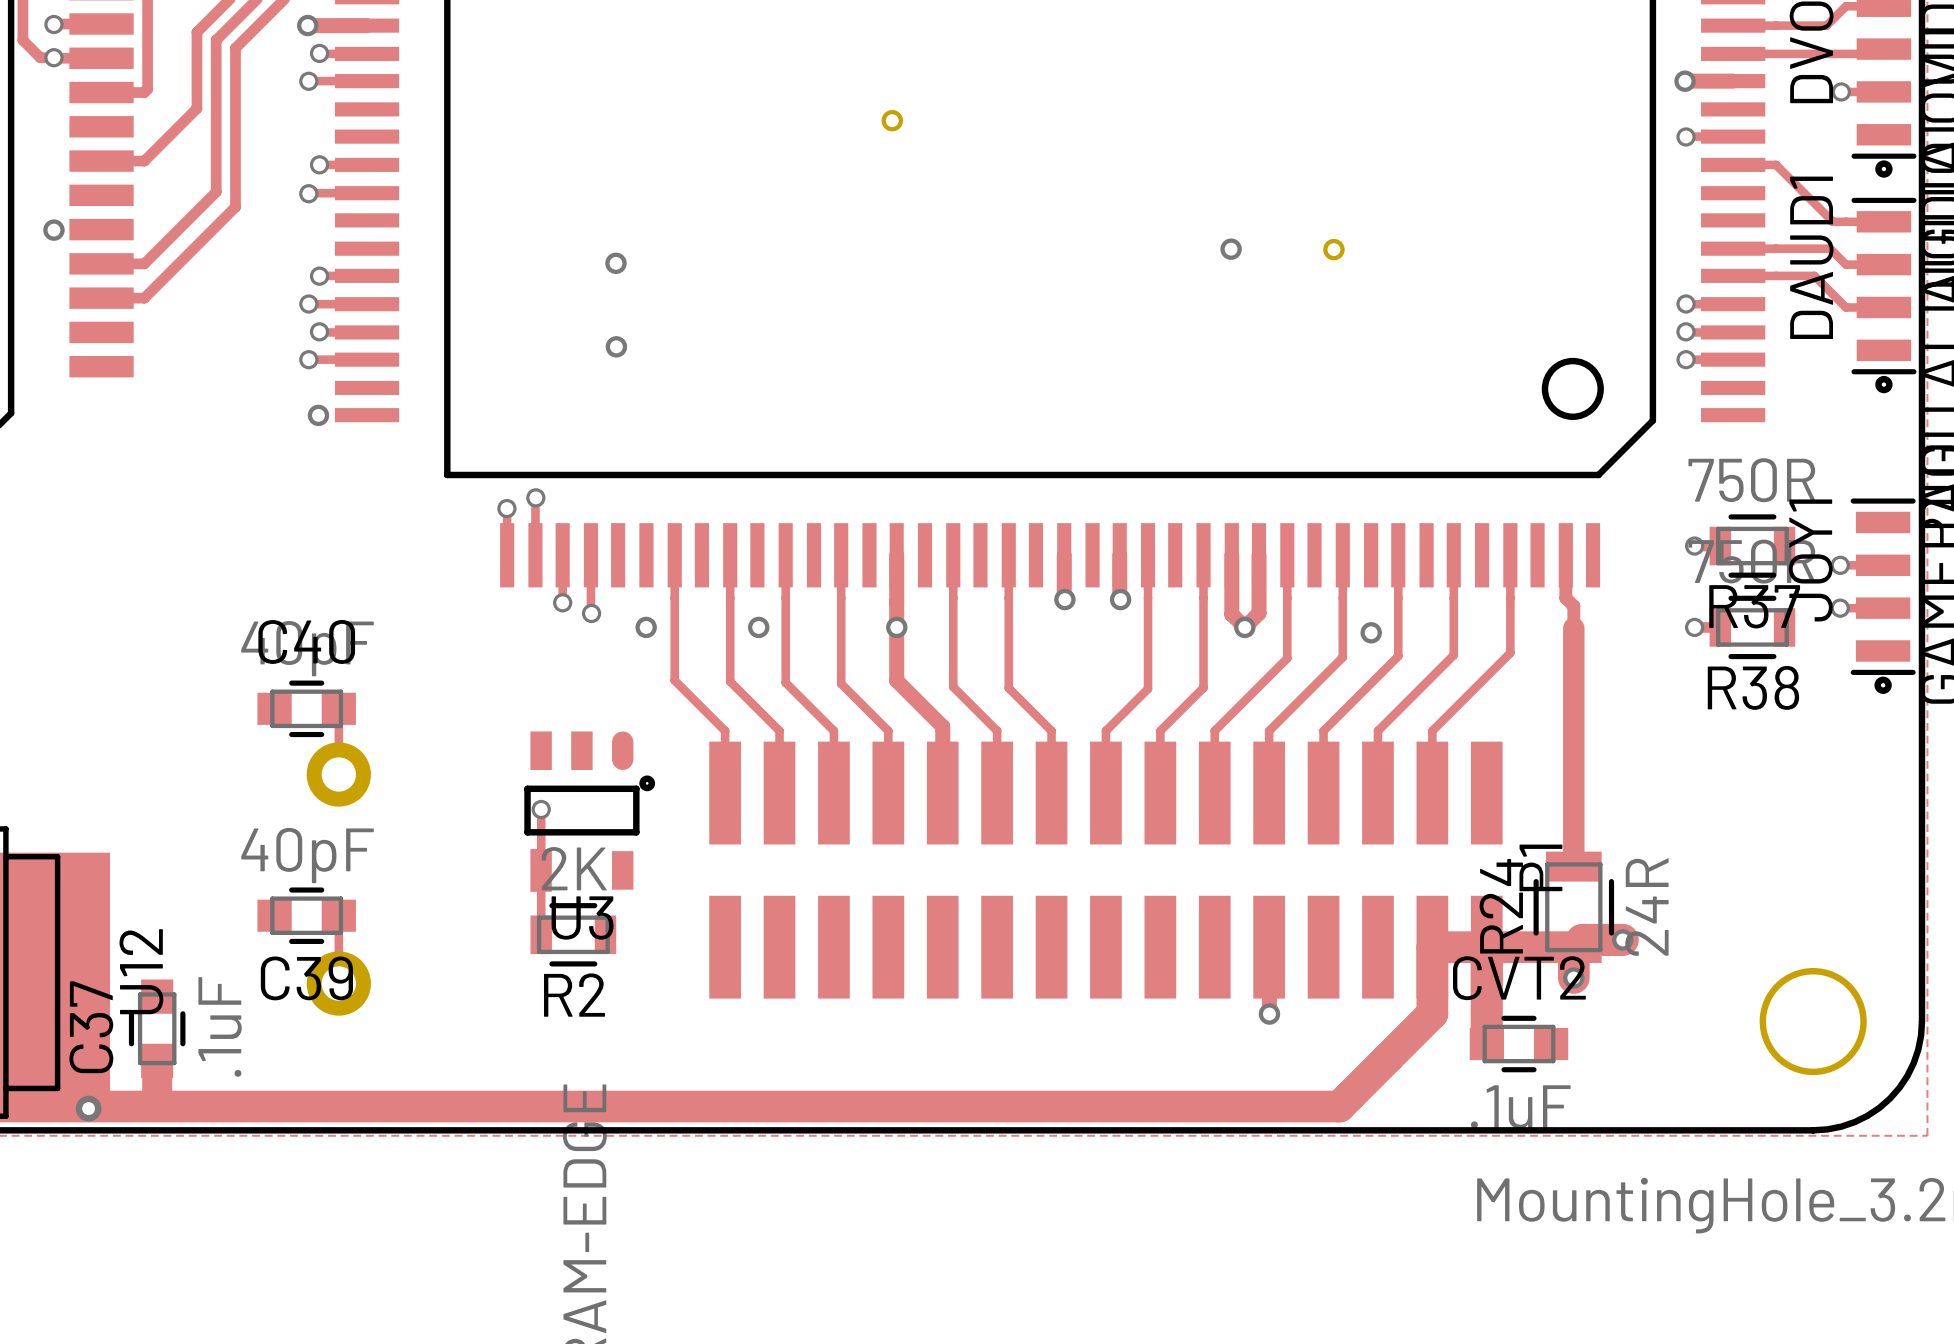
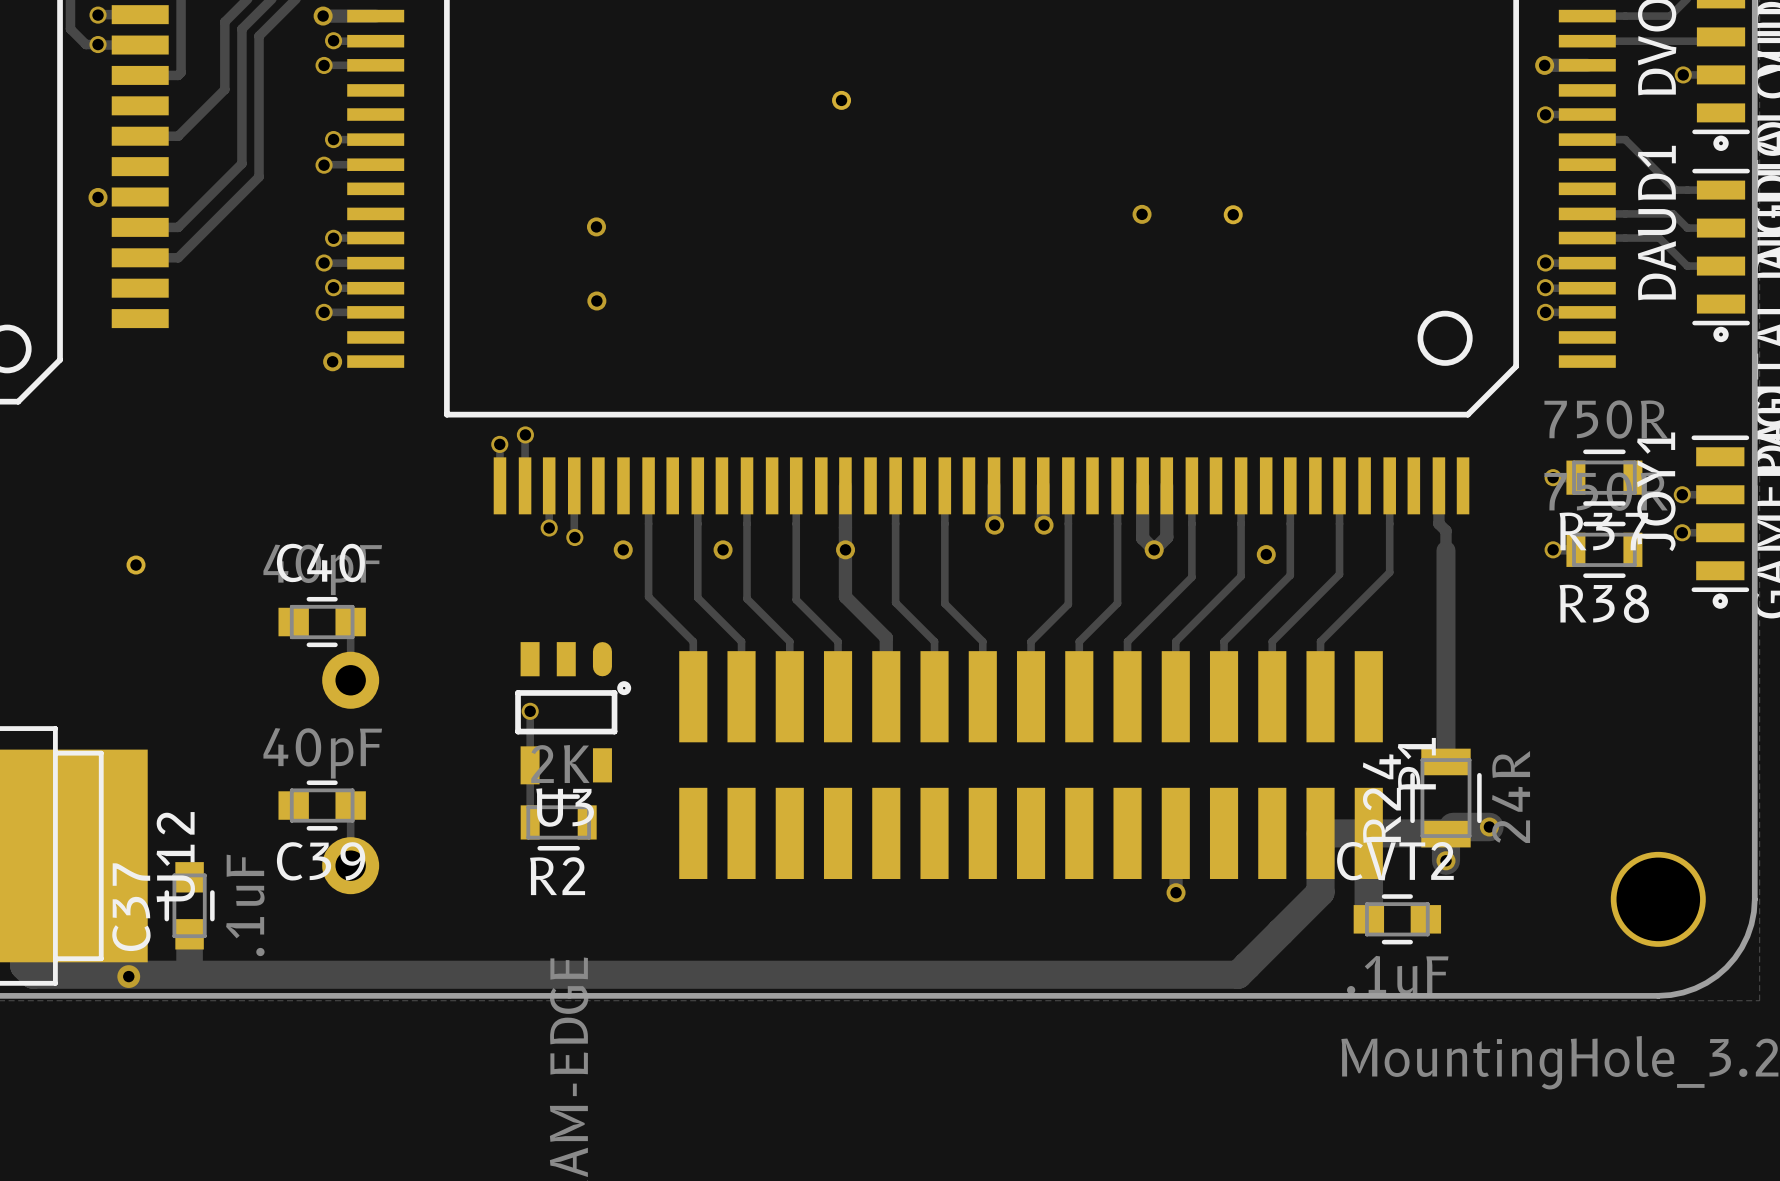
part: none -> (136, 565)

